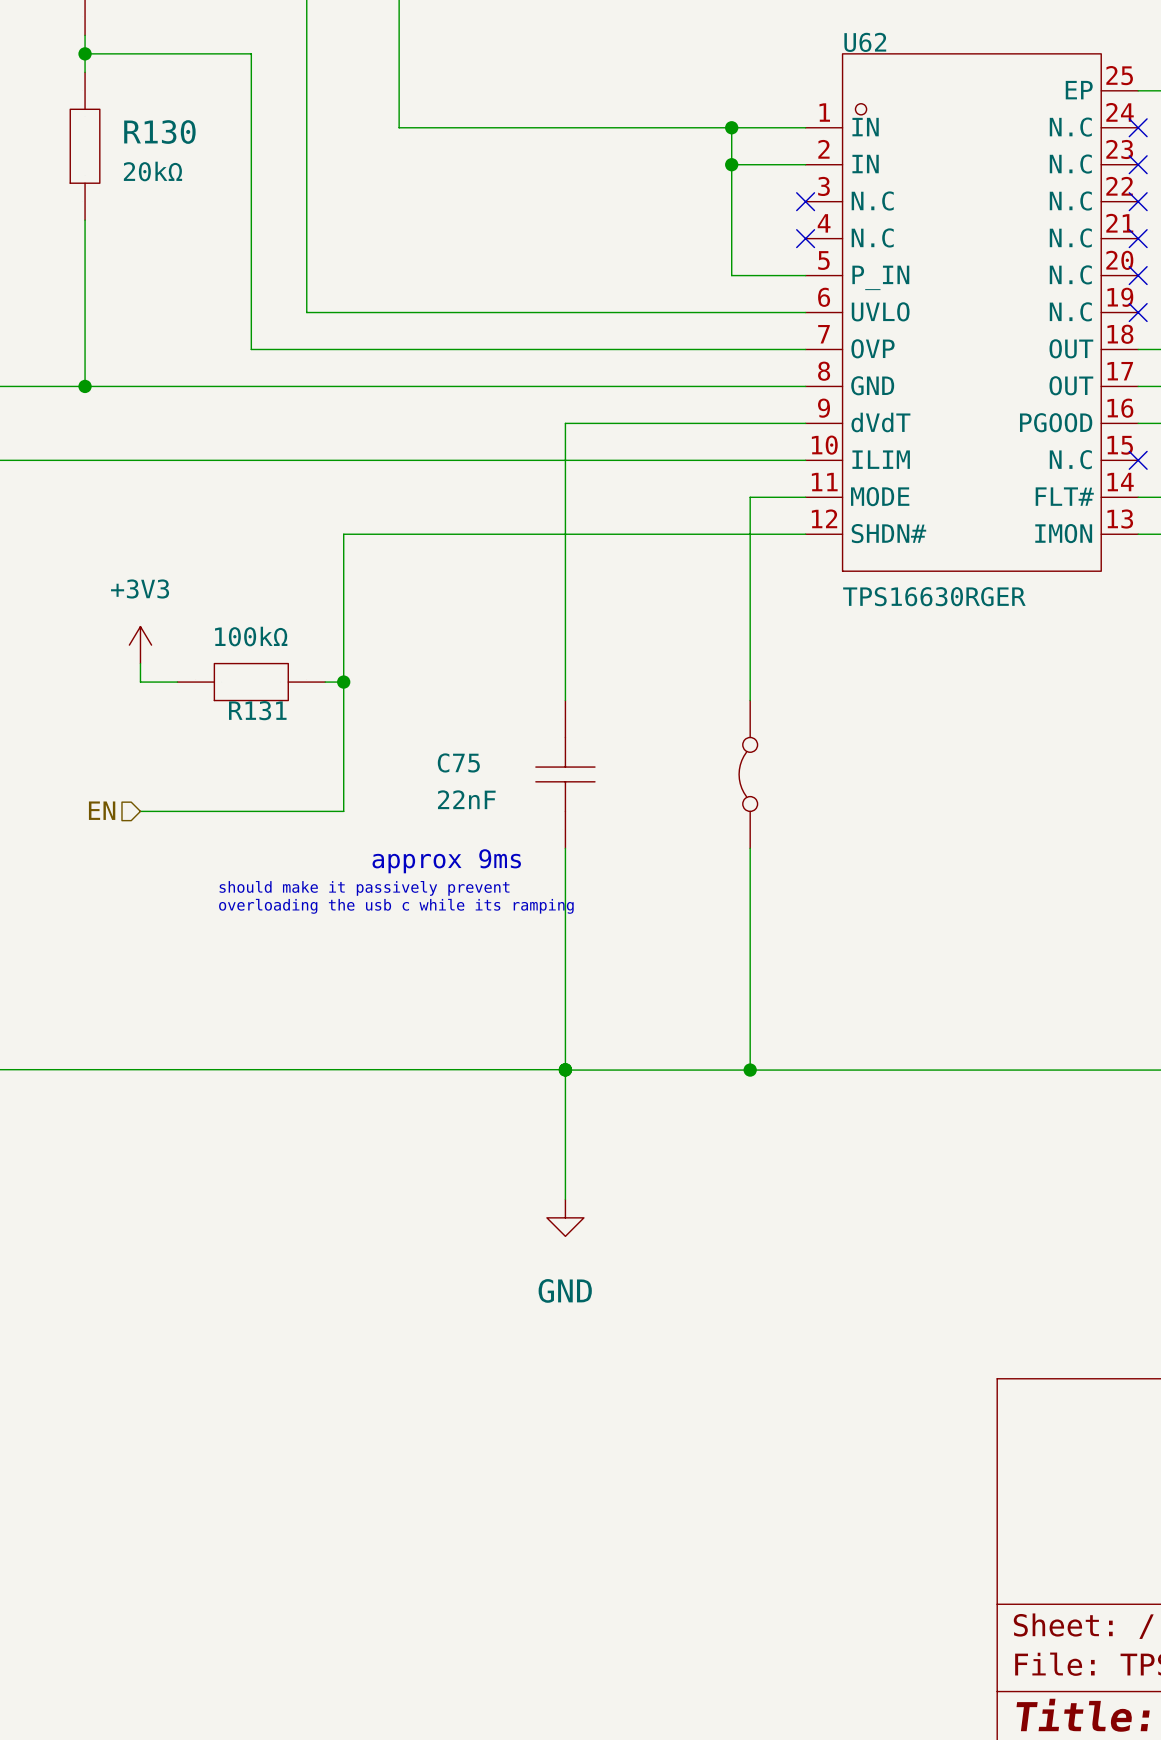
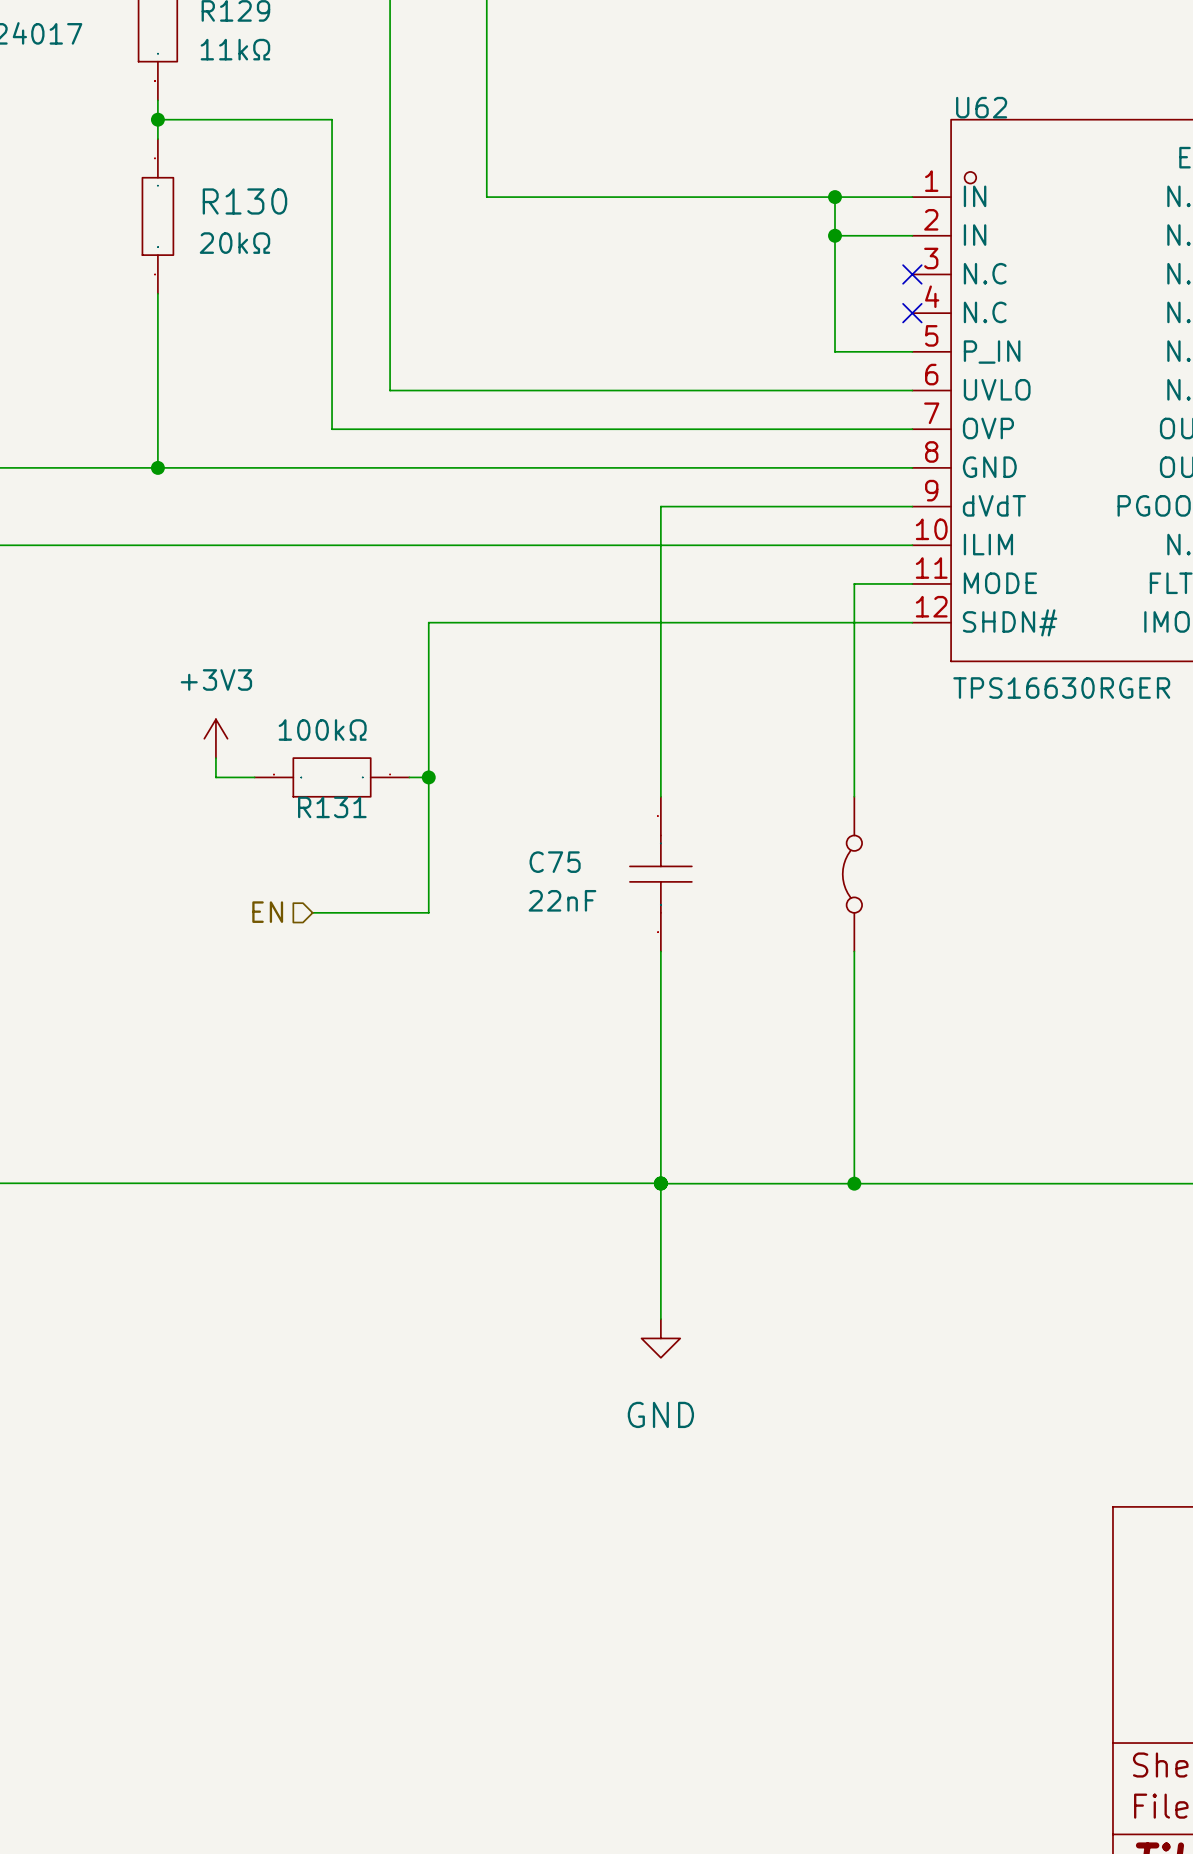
hierarchical label position: EN (102, 810) -> EN (267, 912)
wire: (140, 811) (232, 811) -> none
text: approx 9ms (446, 861) -> none
text: should make it passively prevent (364, 888) -> none
text: overloading the usb c while its ramping (396, 906) -> none

